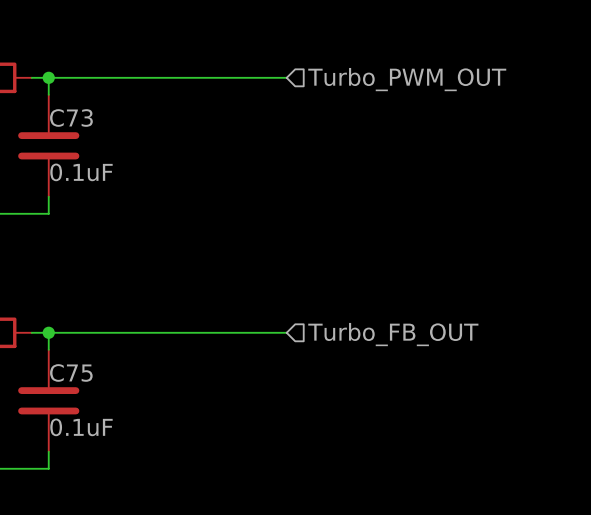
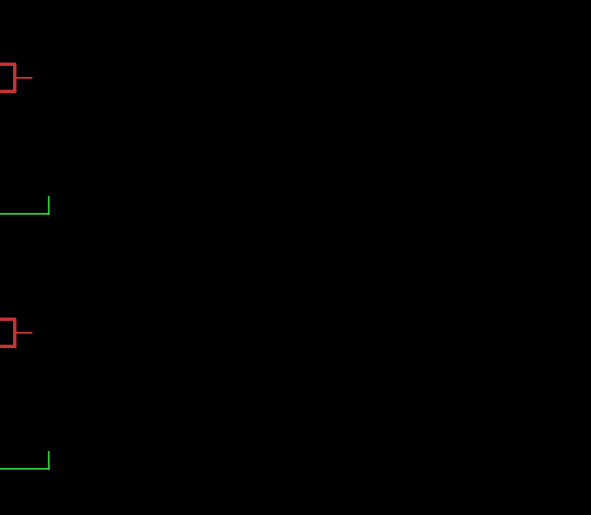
wire: (31, 77) (286, 77) -> none
wire: (48, 77) (48, 94) -> none
junction: (48, 77) -> none
hierarchical label: Turbo_PWM_OUT (407, 79) -> none
C73: 0.1uF (48, 145) -> none
wire: (31, 332) (286, 332) -> none
wire: (48, 332) (48, 349) -> none
junction: (48, 332) -> none
hierarchical label: Turbo_FB_OUT (393, 334) -> none
C75: 0.1uF (48, 400) -> none

